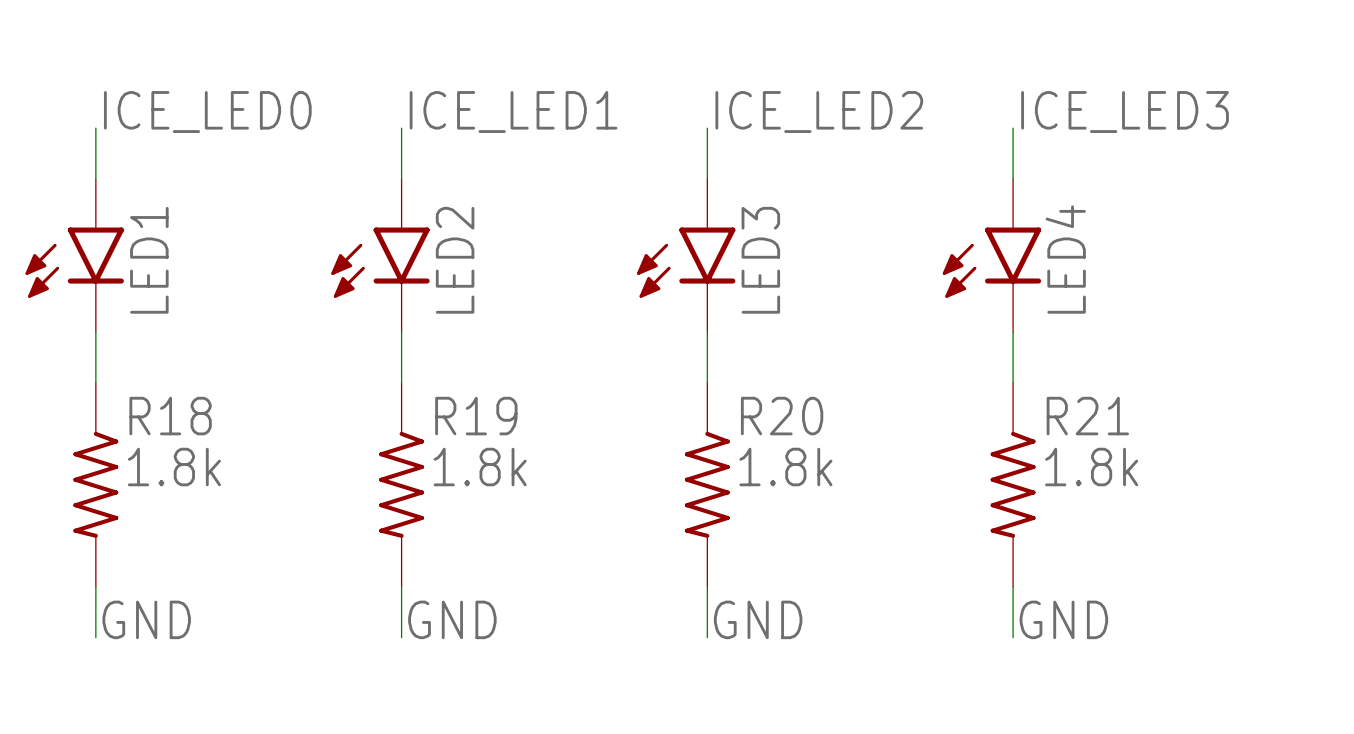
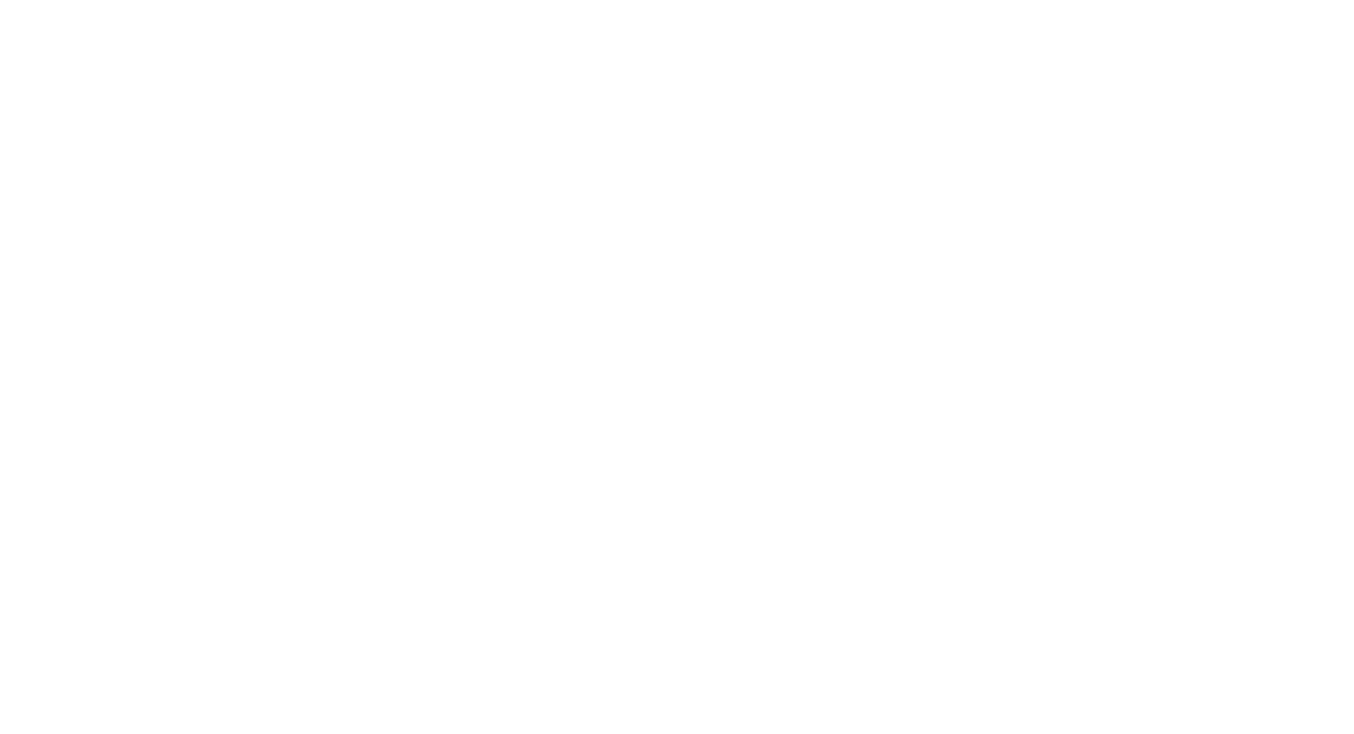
label: ICE_LED0 (207, 112) -> none
label: ICE_LED1 (513, 112) -> none
label: ICE_LED2 (819, 112) -> none
label: ICE_LED3 (1125, 112) -> none
wire: (95, 128) (95, 179) -> none
wire: (401, 128) (401, 179) -> none
wire: (707, 128) (707, 179) -> none
wire: (1013, 128) (1013, 179) -> none
LED1: (74, 255) -> none
LED2: (380, 255) -> none
LED3: (686, 255) -> none
LED4: (991, 255) -> none
wire: (95, 331) (95, 382) -> none
wire: (401, 331) (401, 382) -> none
wire: (707, 331) (707, 382) -> none
wire: (1013, 331) (1013, 382) -> none
R18: 1.8k (95, 484) -> none
R19: 1.8k (401, 484) -> none
R20: 1.8k (707, 484) -> none
R21: 1.8k (1013, 484) -> none
wire: (95, 586) (95, 637) -> none
wire: (401, 586) (401, 637) -> none
wire: (707, 586) (707, 637) -> none
wire: (1013, 586) (1013, 637) -> none
label: GND (146, 619) -> none
label: GND (452, 619) -> none
label: GND (758, 619) -> none
label: GND (1063, 619) -> none

